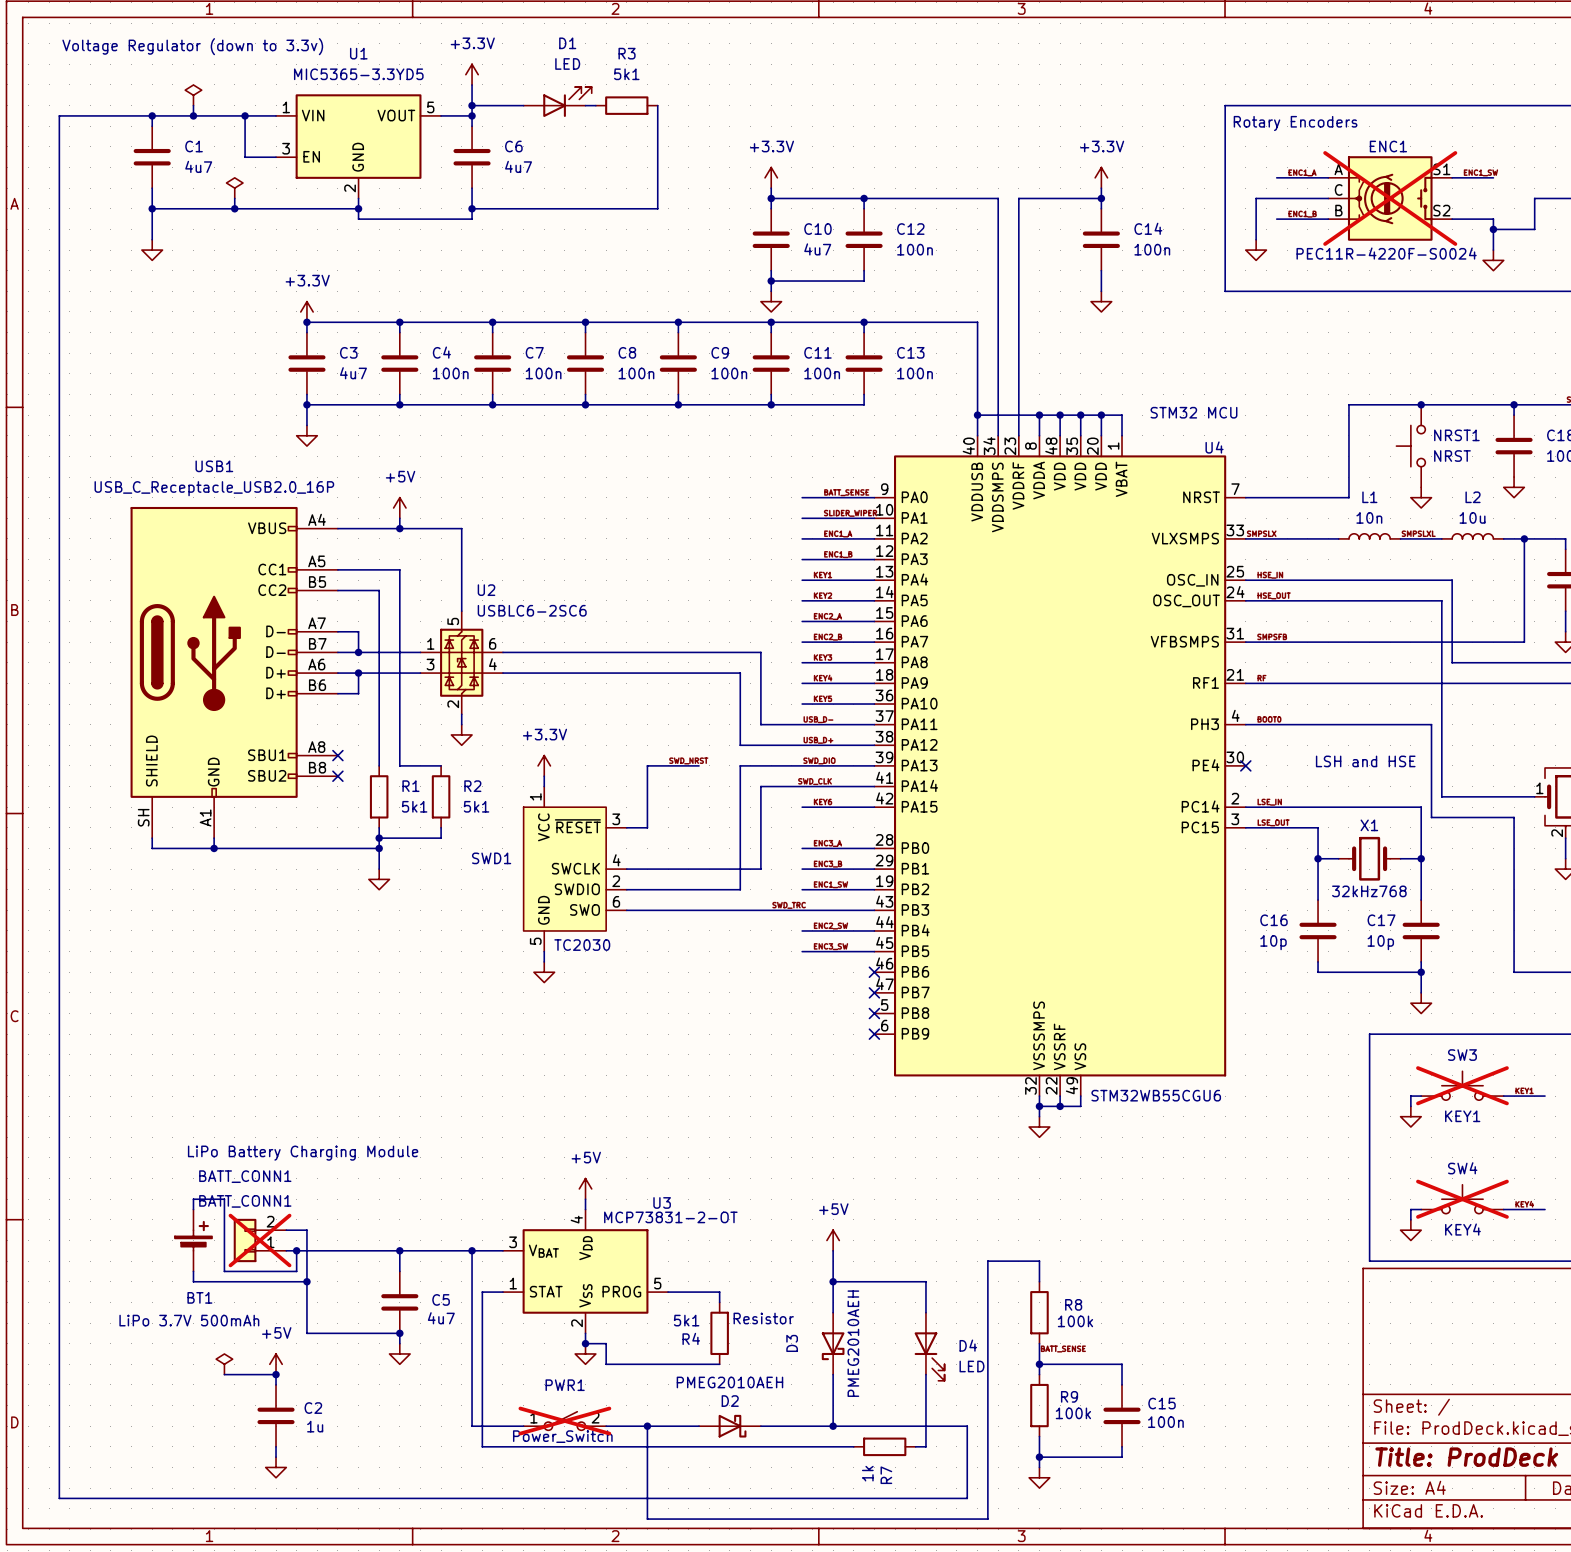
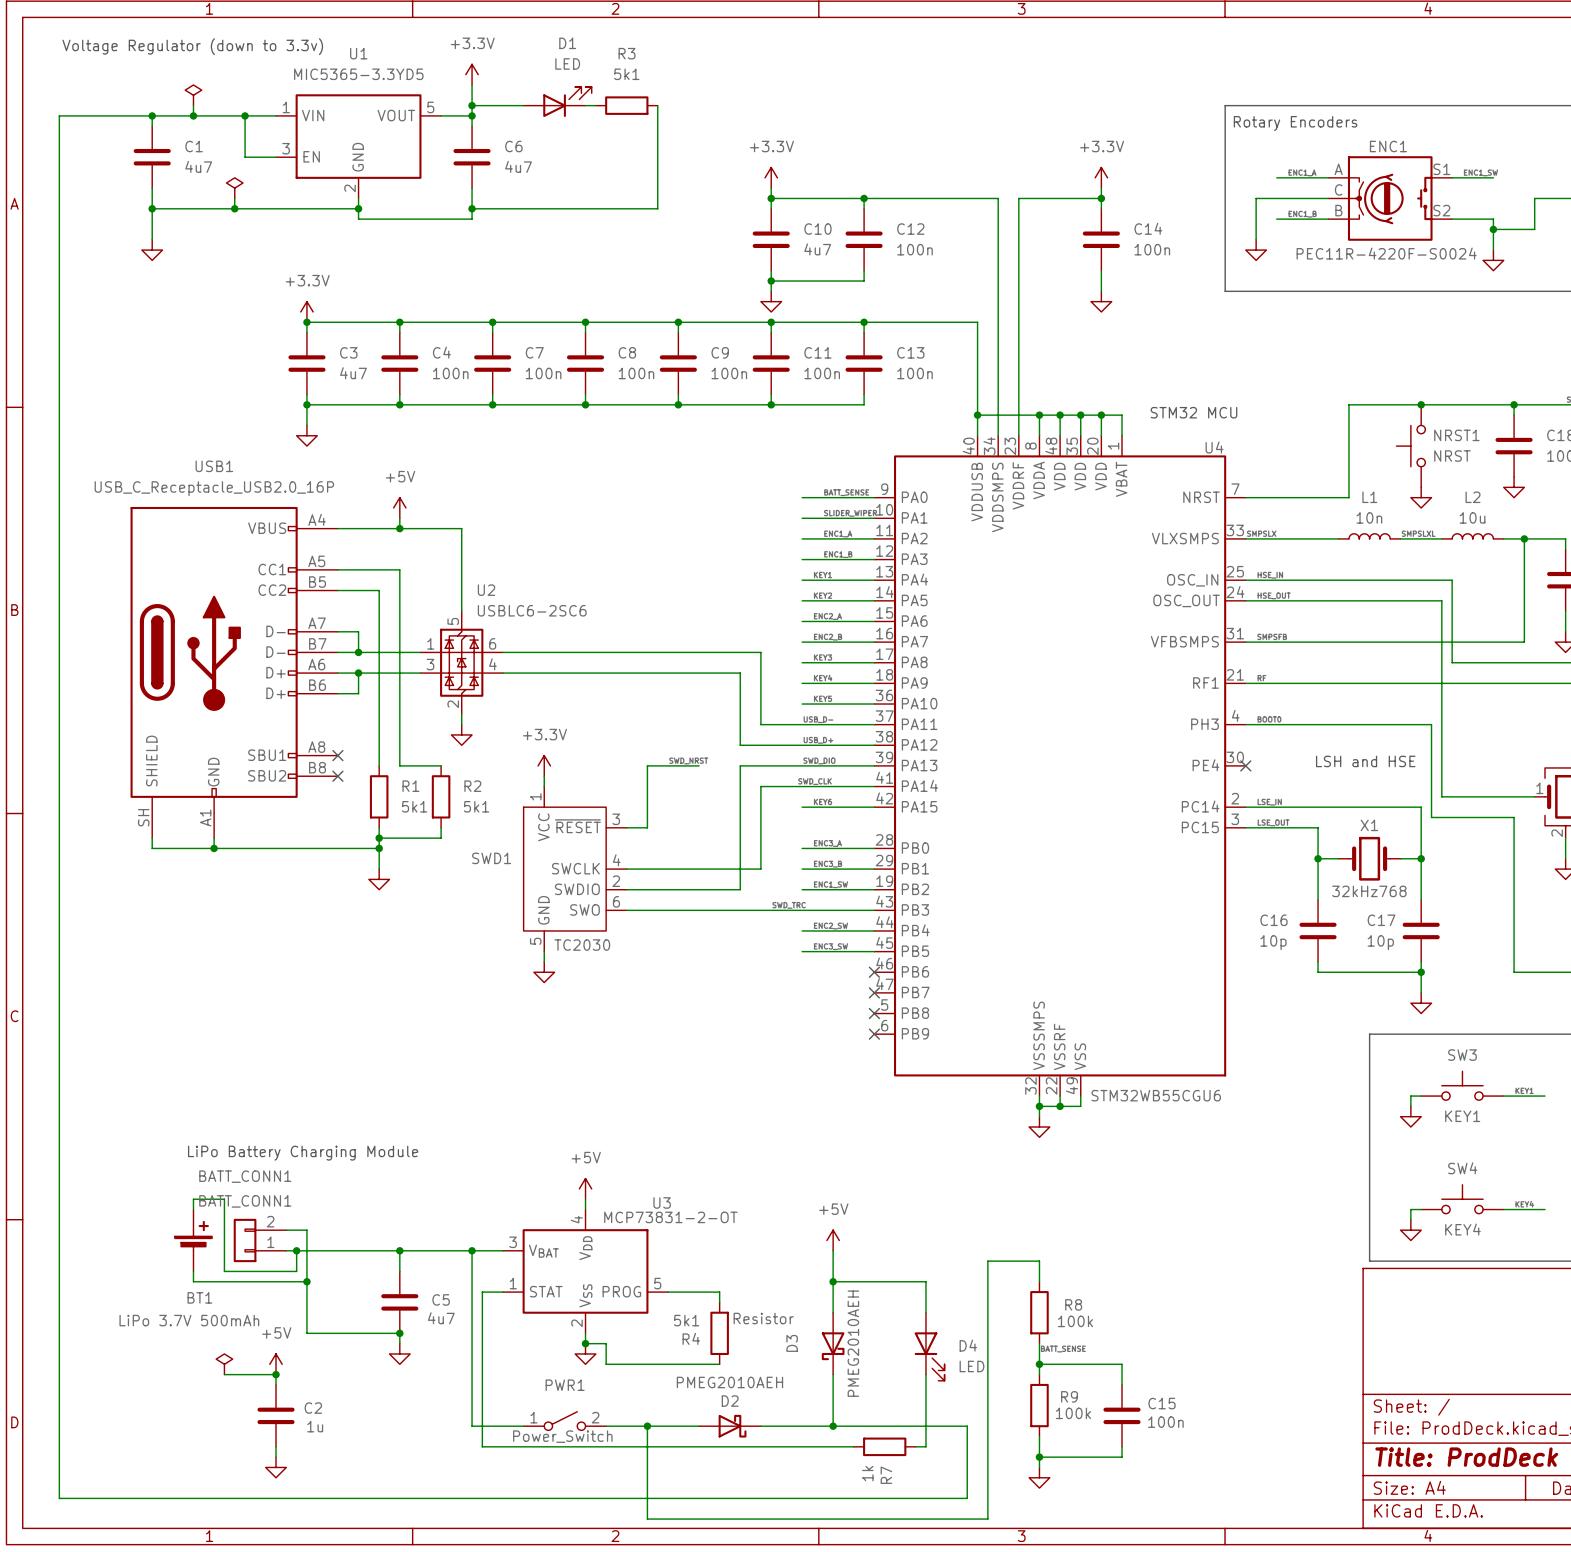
ENC1 do-not-place cross: (1390, 198) -> none
SW3 do-not-place cross: (1462, 1085) -> none
SW4 do-not-place cross: (1462, 1199) -> none
BATT_CONN1 do-not-place cross: (260, 1240) -> none
PWR1 do-not-place cross: (564, 1421) -> none

